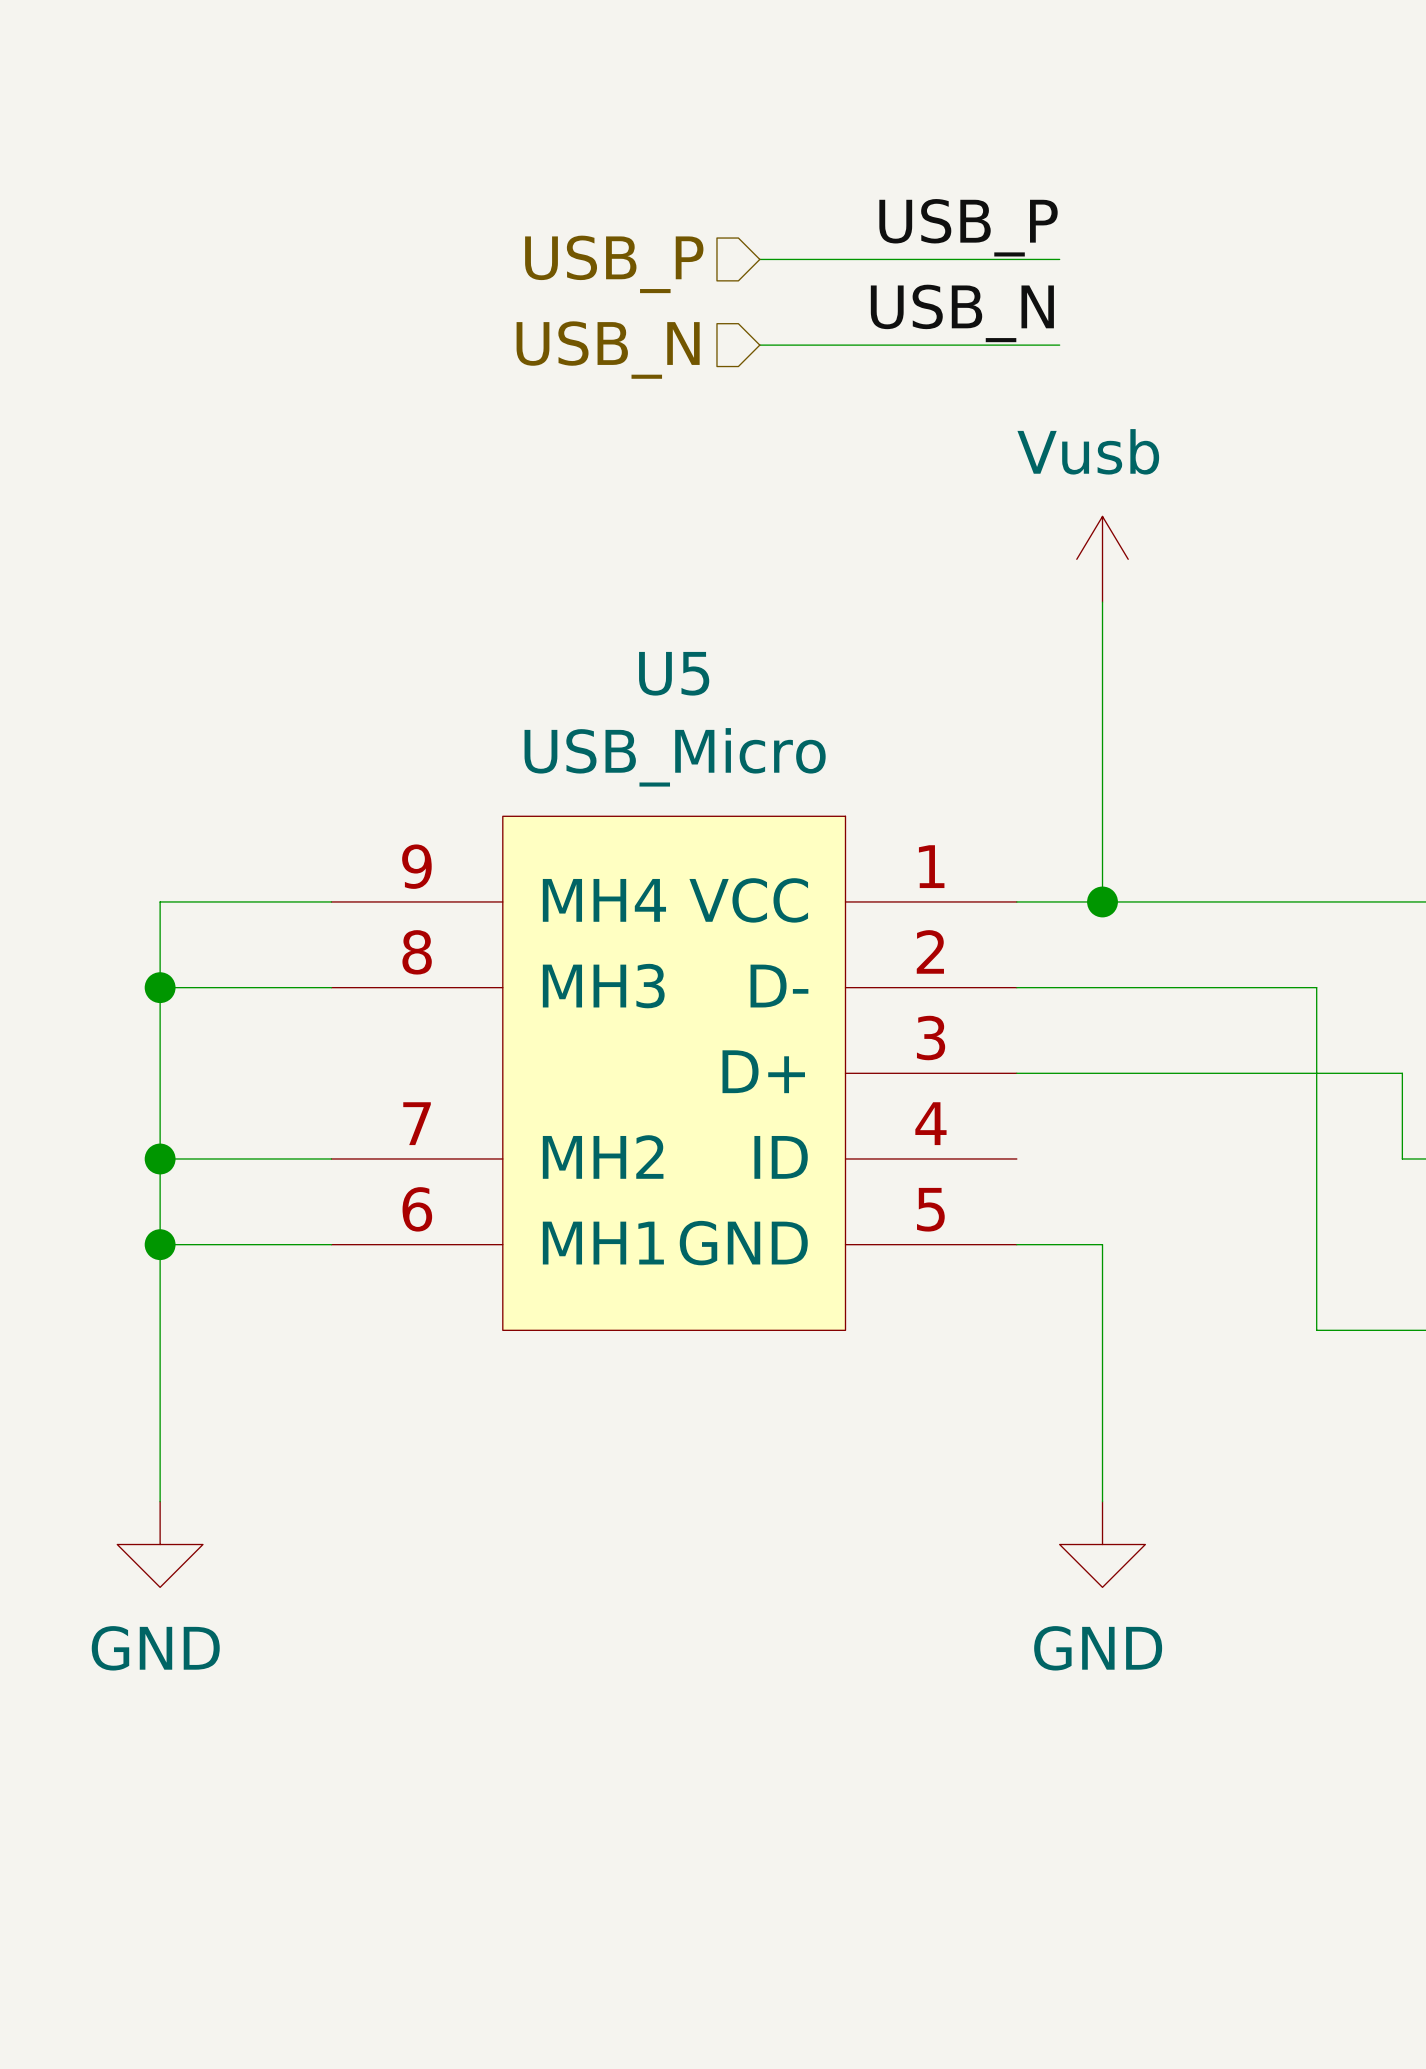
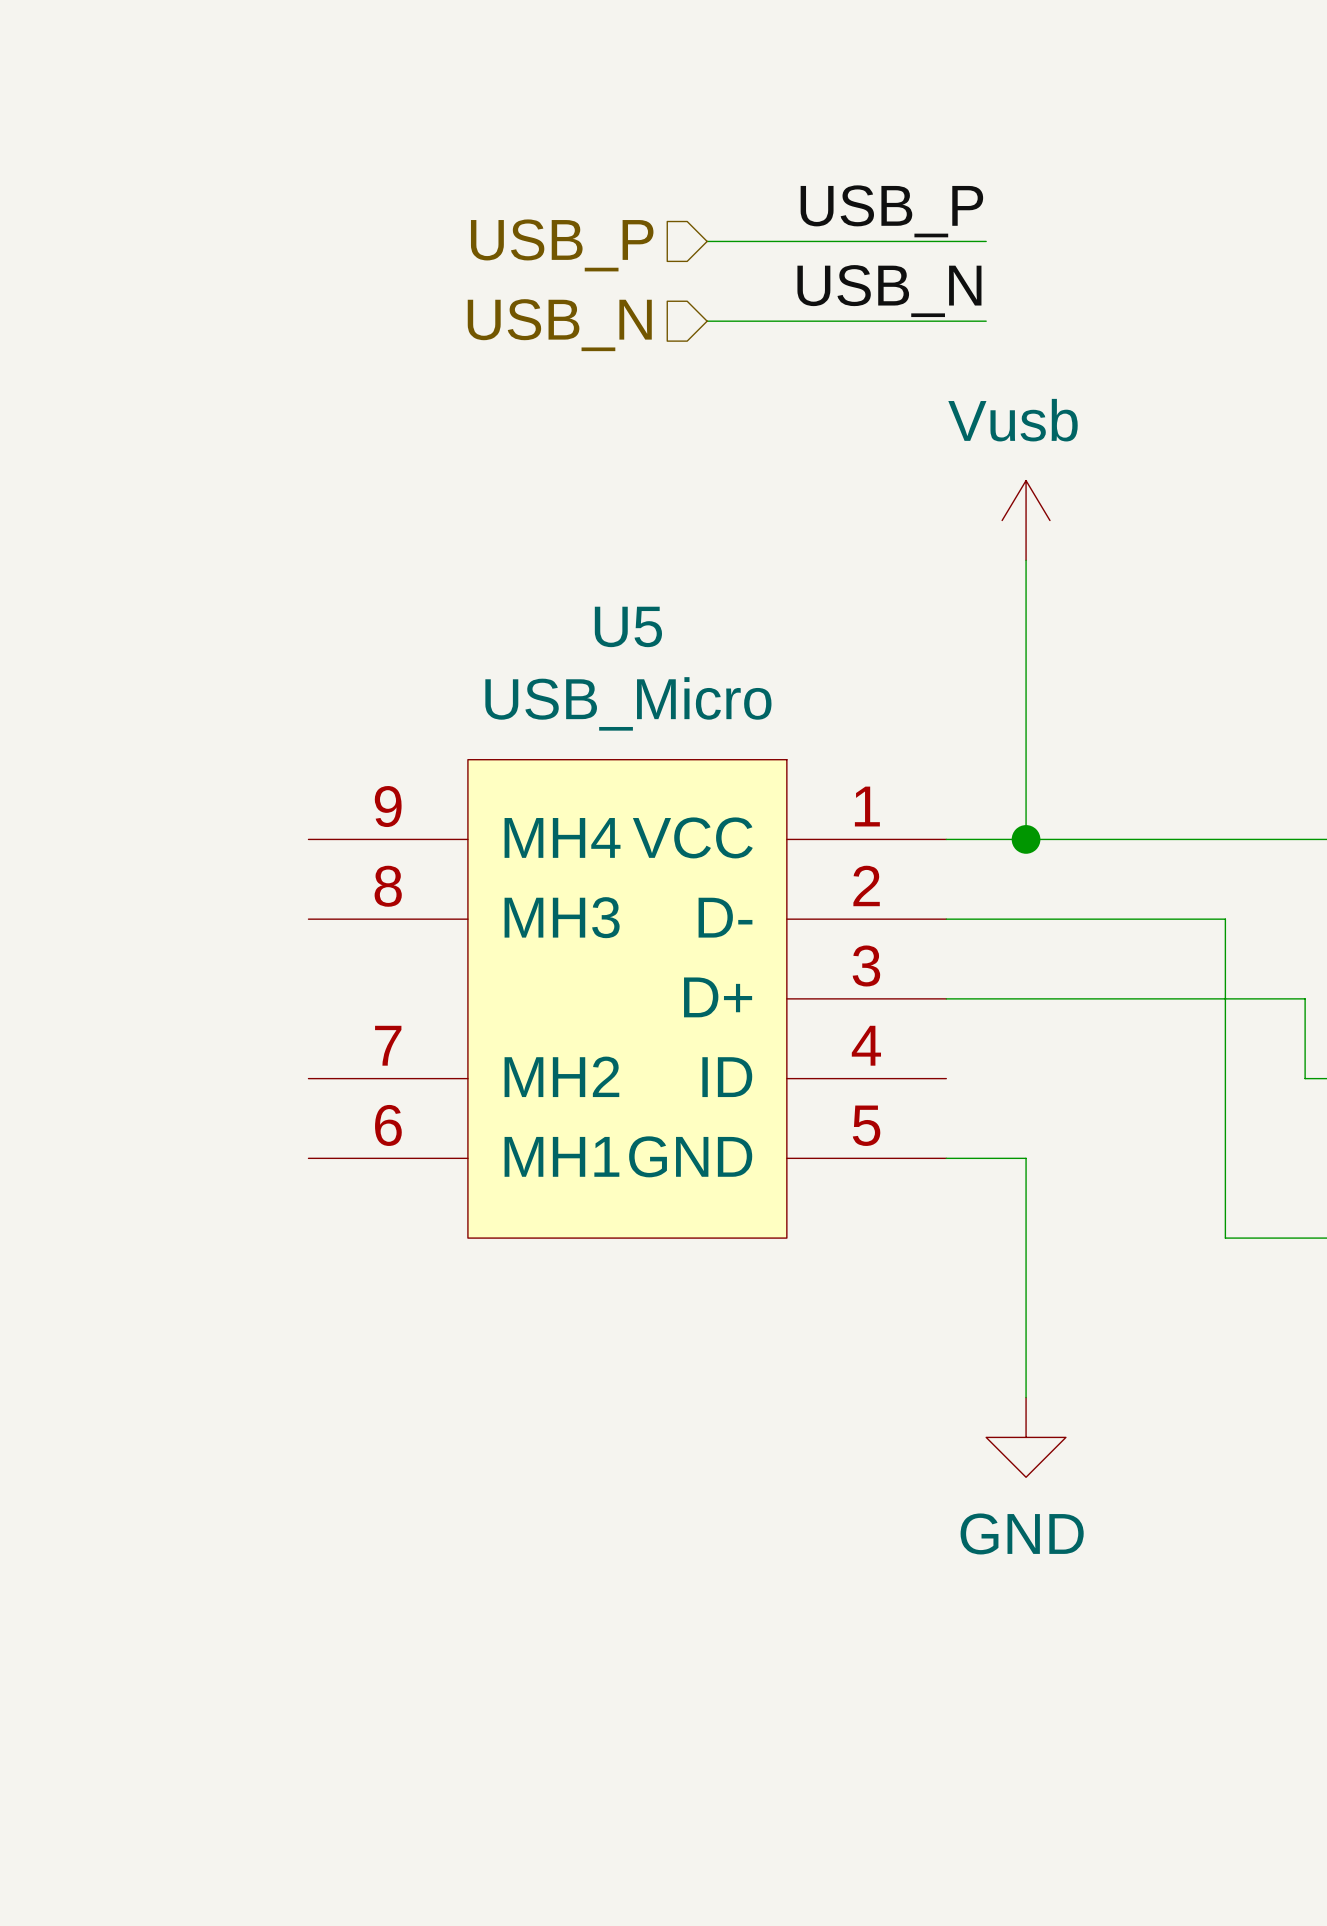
wire: (331, 901) (160, 901) (160, 1501) -> none
wire: (160, 987) (331, 987) -> none
junction: (160, 987) -> none
wire: (160, 1158) (331, 1158) -> none
junction: (160, 1158) -> none
wire: (160, 1244) (331, 1244) -> none
junction: (160, 1244) -> none
power symbol: GND (160, 1544) -> none

